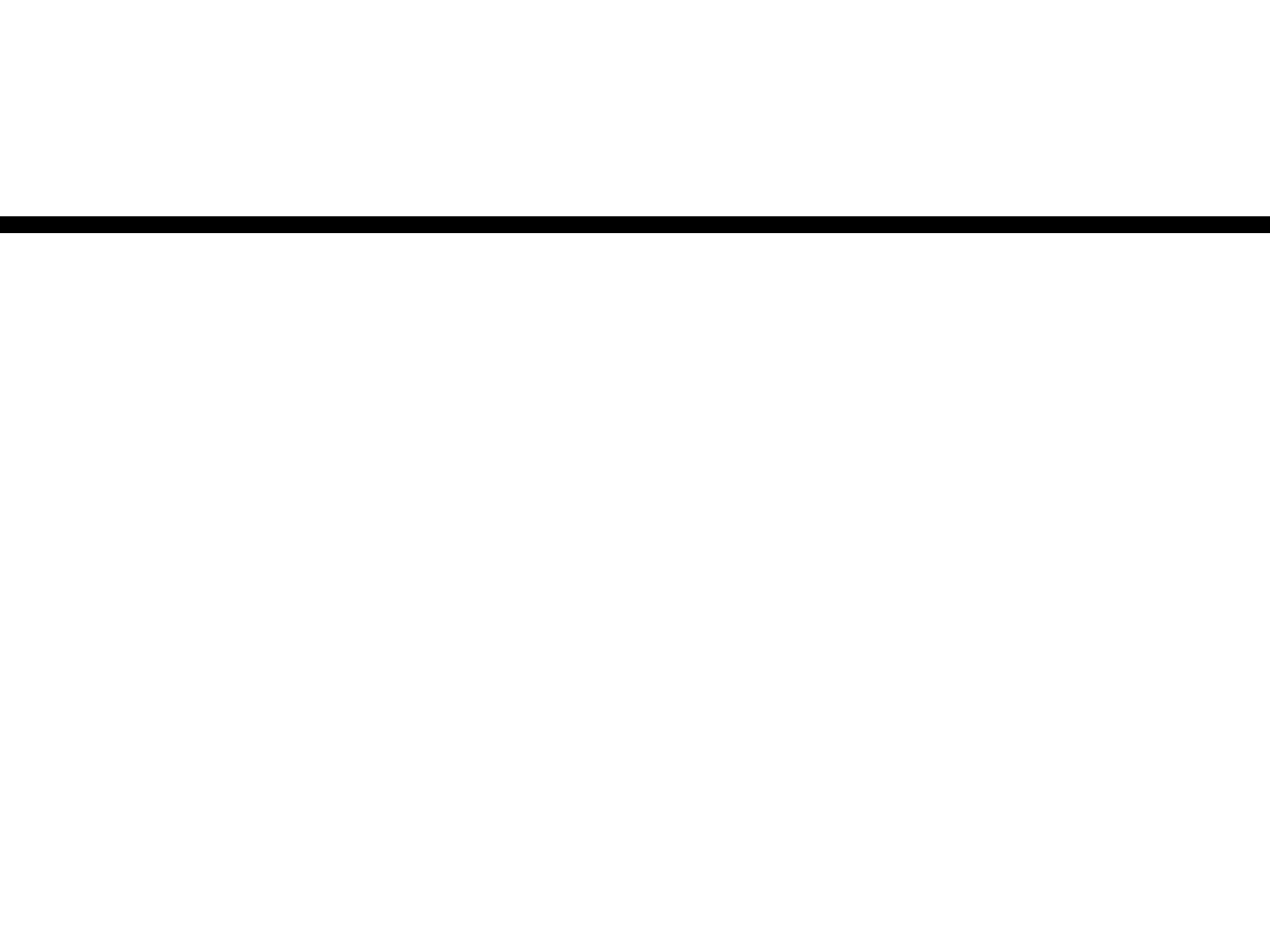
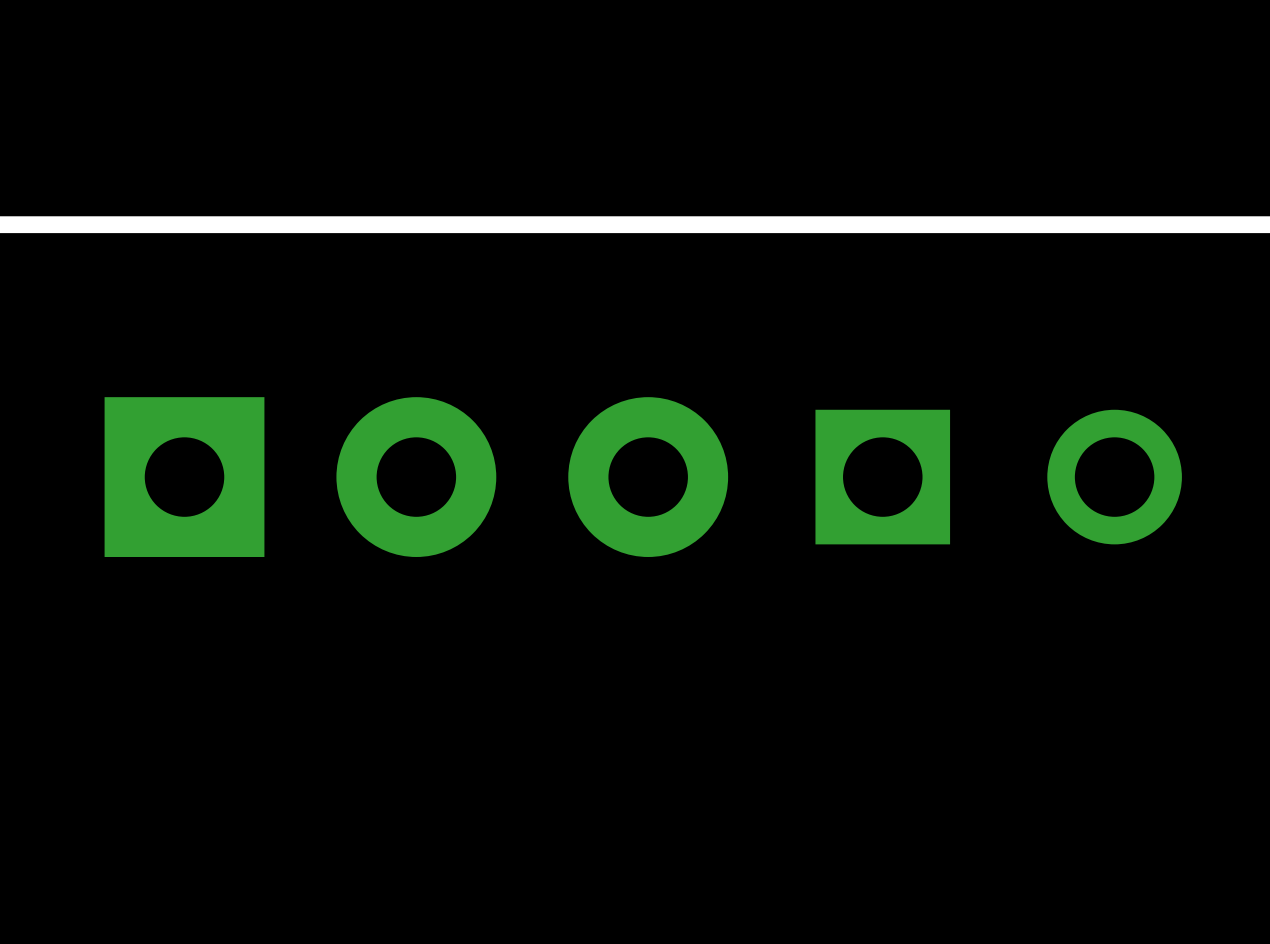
part: none -> (416, 477)
part: none -> (998, 477)

